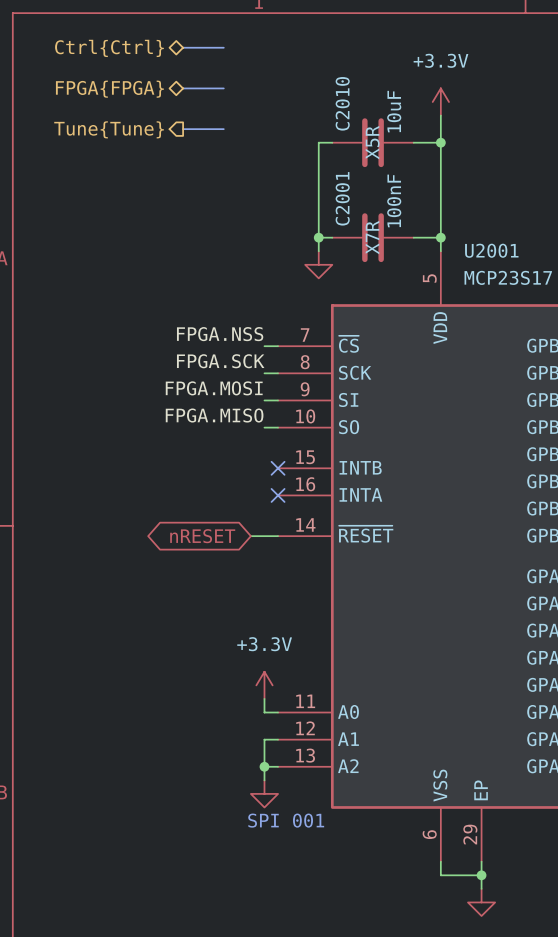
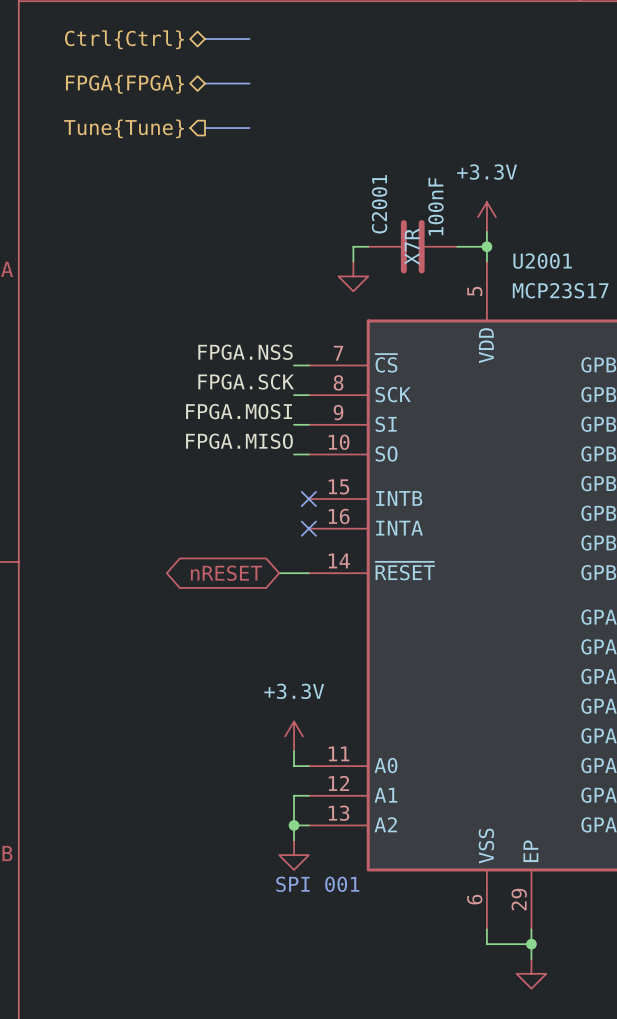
power symbol position: +3.3V (440, 102) -> +3.3V (486, 217)
wire: (440, 115) (440, 224) -> none
wire: (332, 142) (318, 142) (318, 237) -> none
C2010: 10uF (373, 142) -> none
wire: (413, 142) (440, 142) -> none
junction: (440, 142) -> none
junction: (318, 237) -> none

